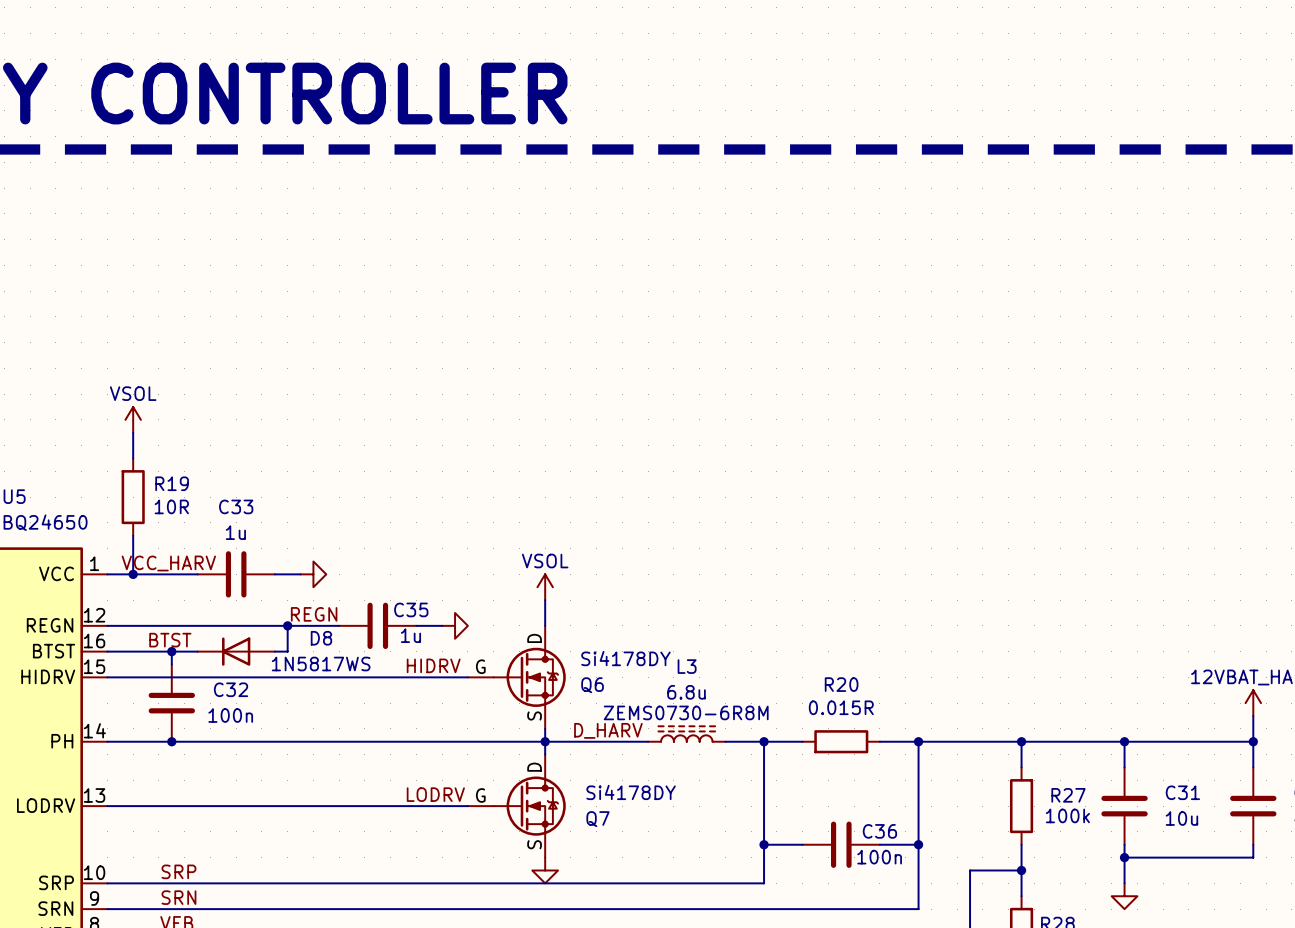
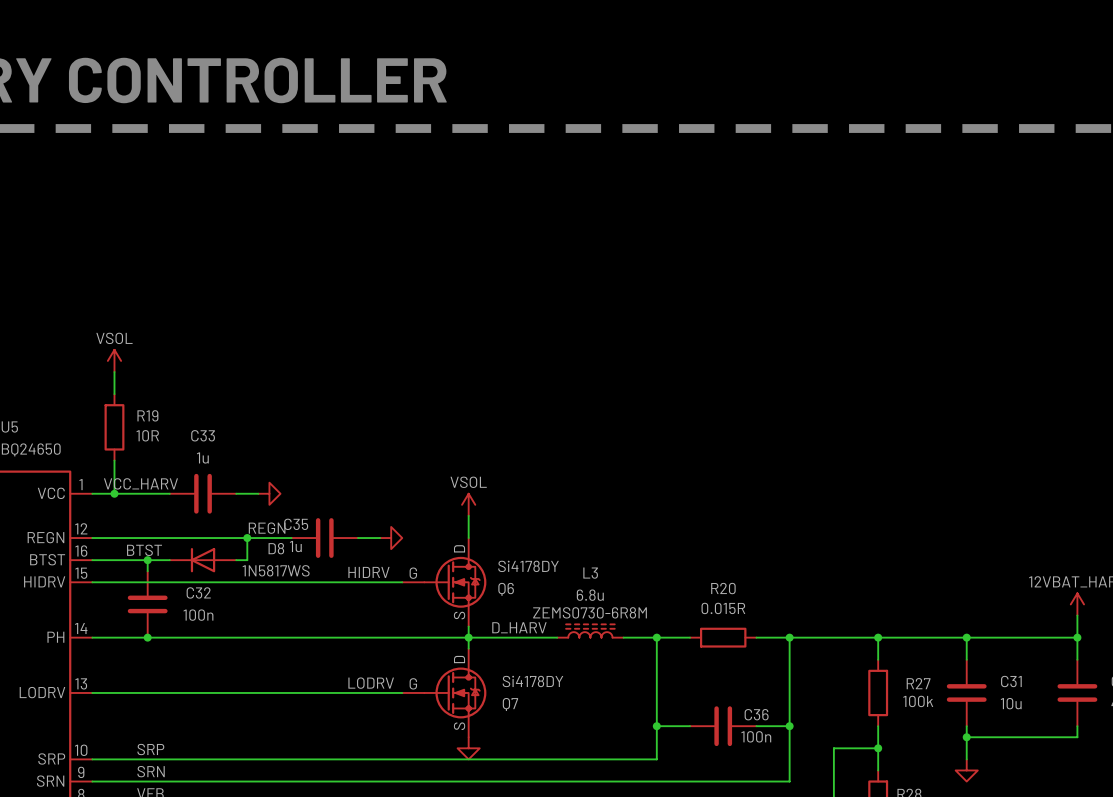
C35 name position: C35 (411, 609) -> C35 (296, 524)
C35 value position: 1u (410, 635) -> 1u (295, 546)

